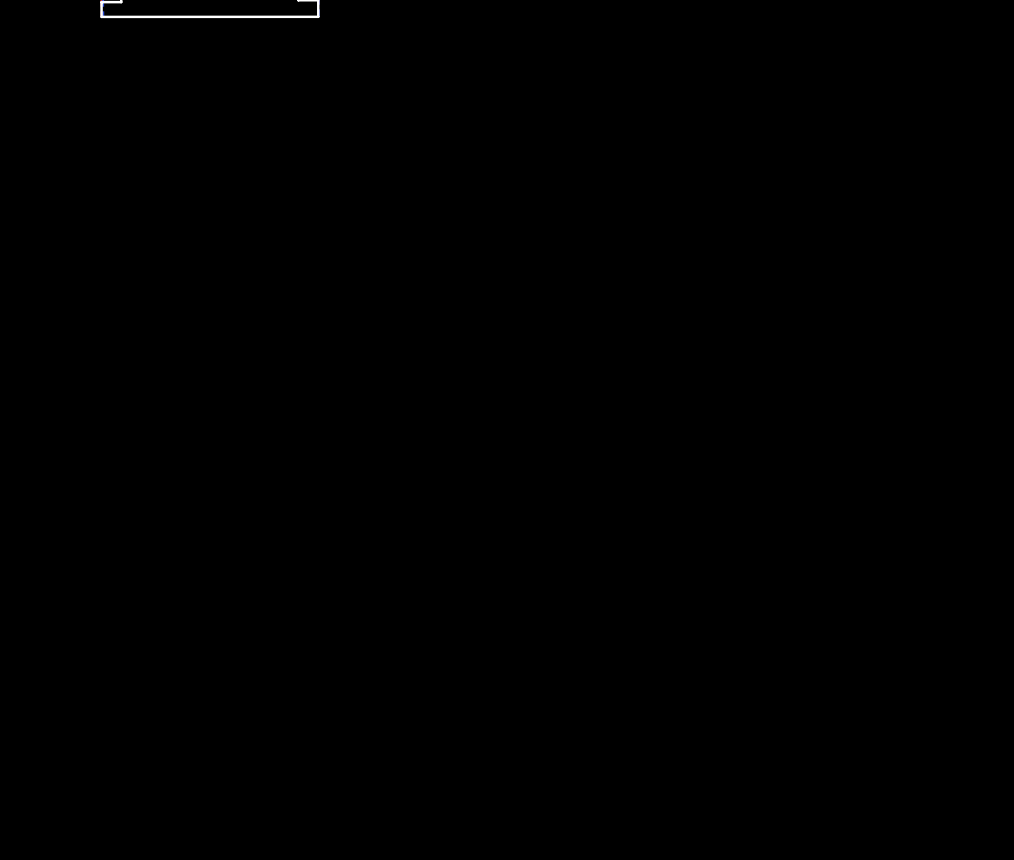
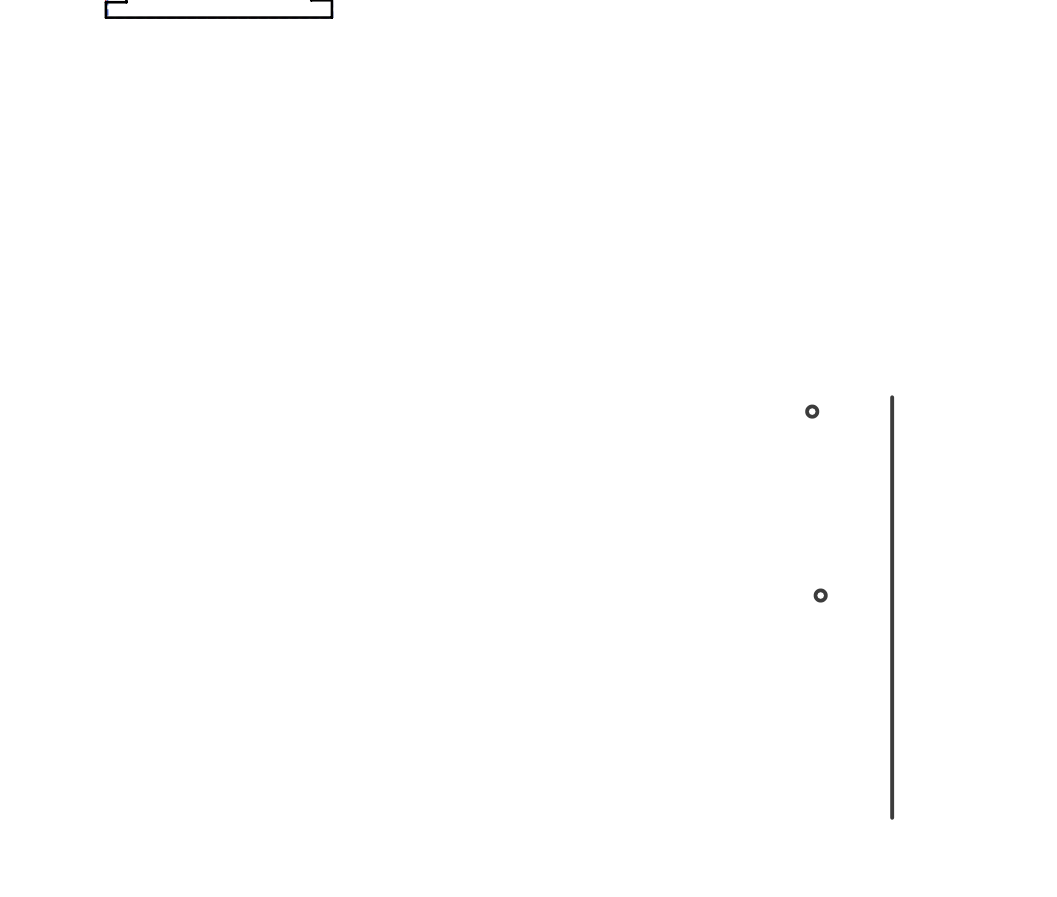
line: none -> (892, 397) (892, 817)
drawing: none -> [805, 404, 820, 419]
drawing: none -> [813, 588, 828, 603]

